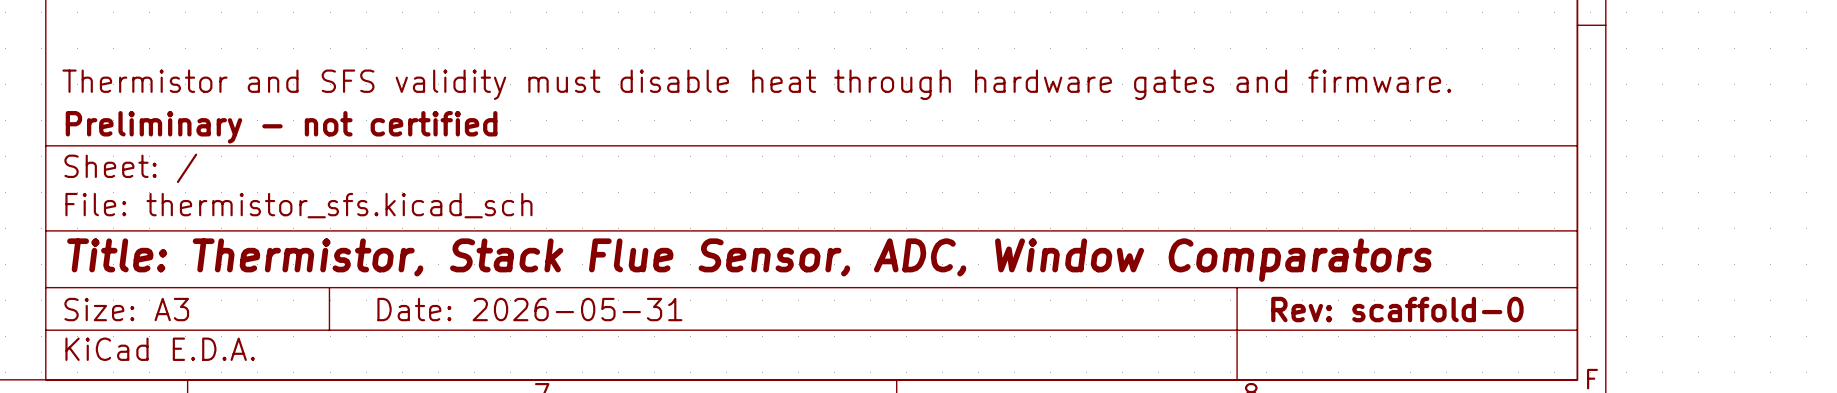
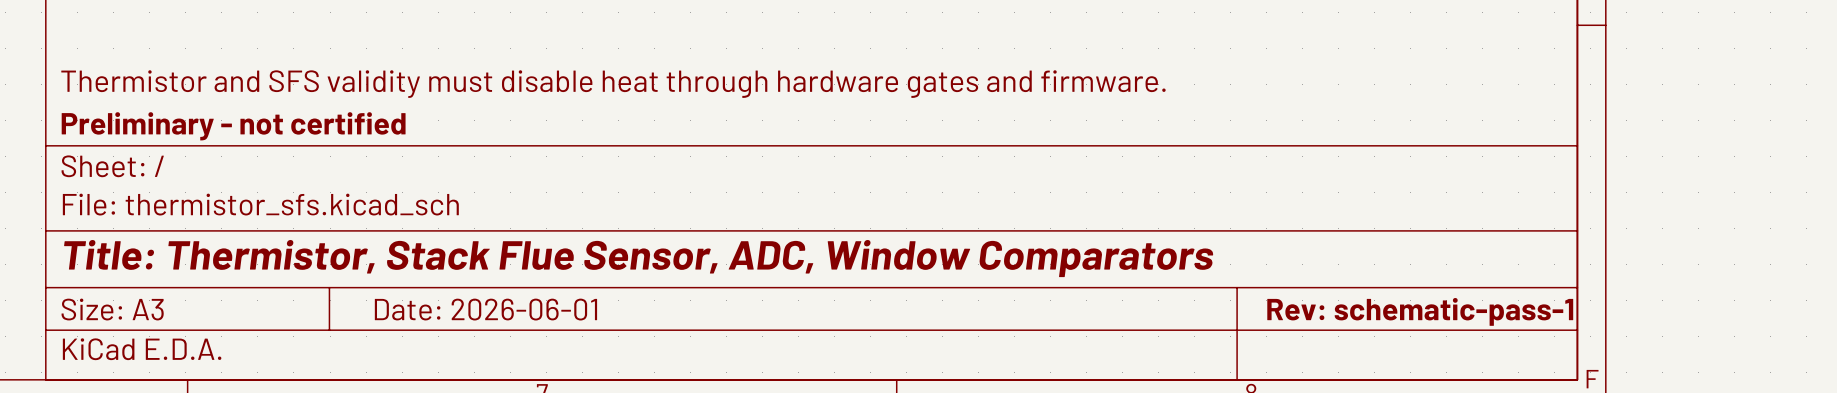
title block: Date: 2026-05-31 (529, 309) -> Date: 2026-06-01 (485, 309)
title block: Rev: scaffold-0 (1397, 309) -> Rev: schematic-pass-1 (1420, 311)

